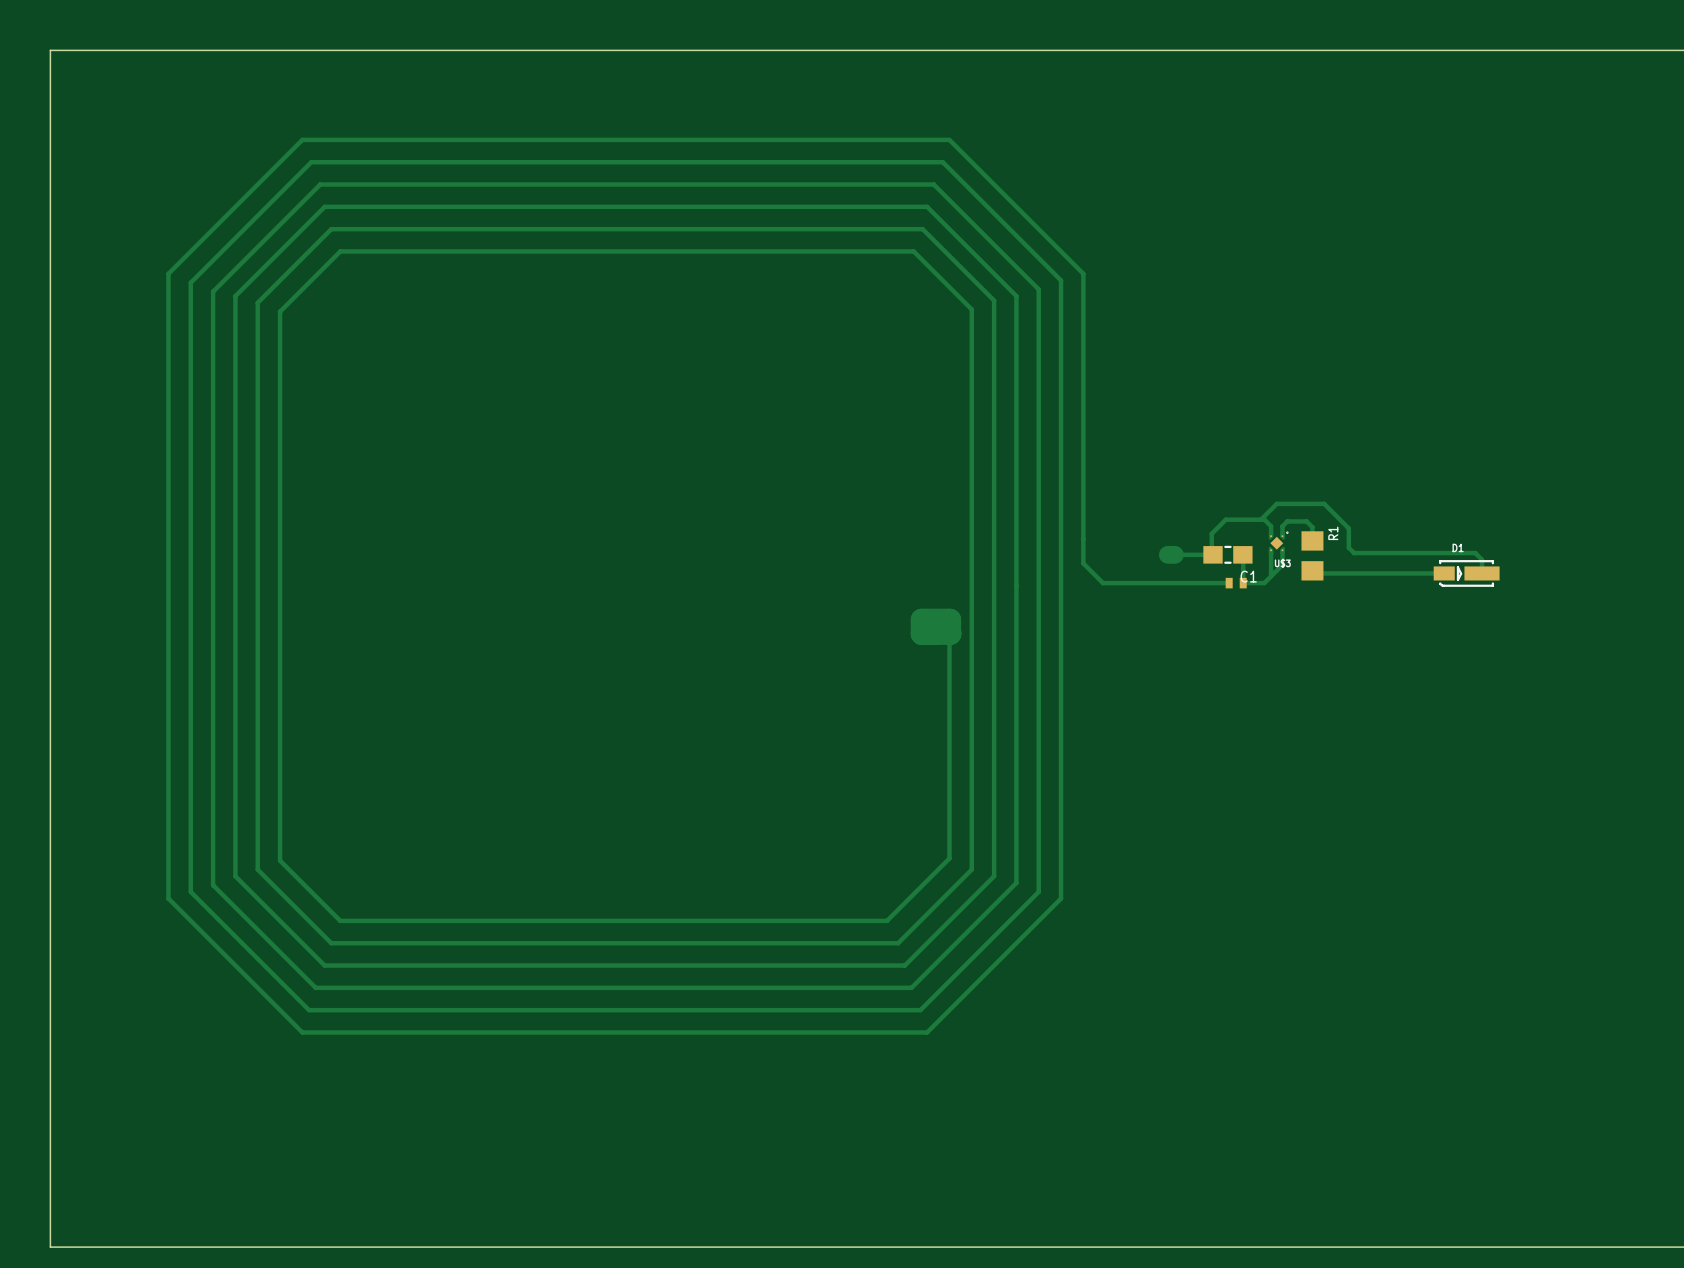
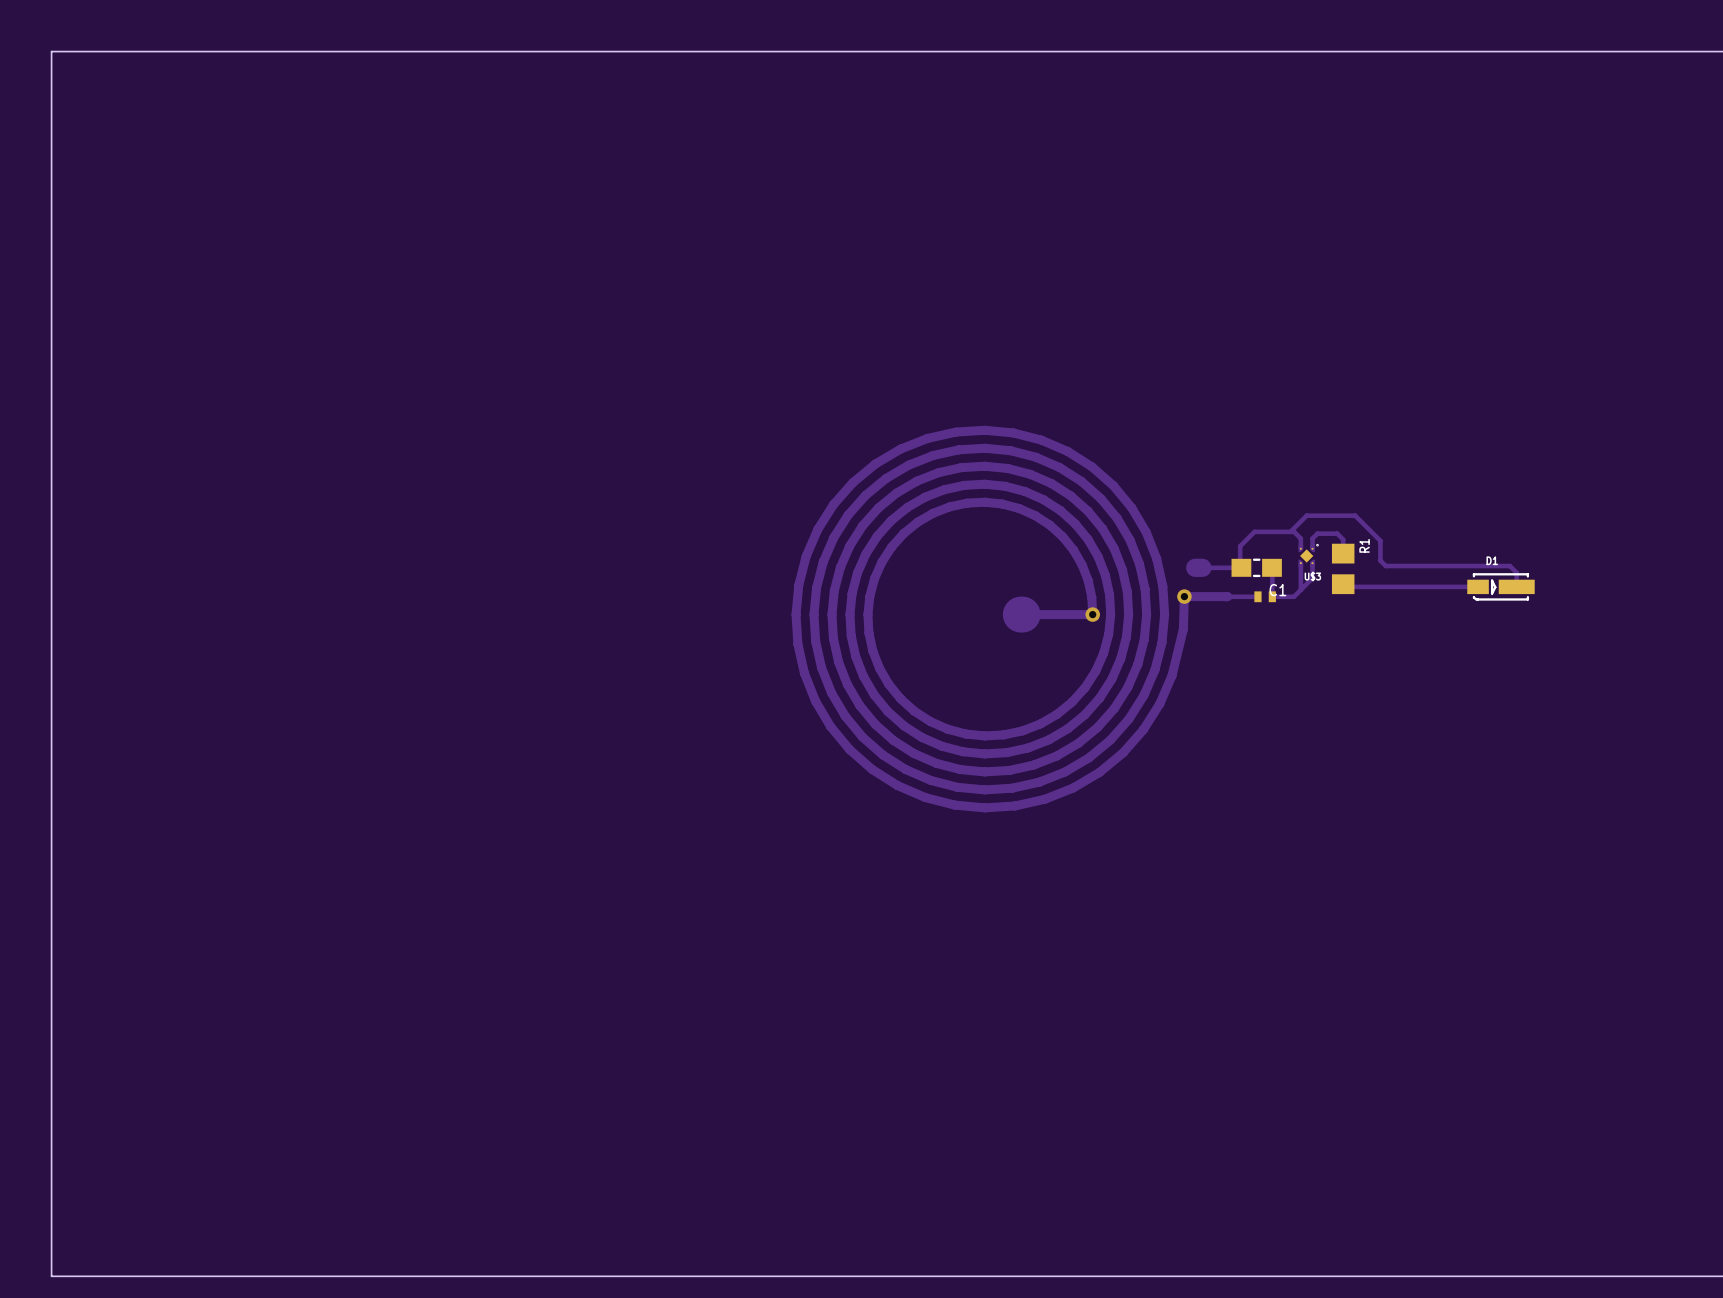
via: none -> (1184, 596)
track: (1197, 583) (1103, 583) (1083, 563) (1083, 273) (949, 139) (302, 139) (168, 273) (168, 898) (302, 1032) (927, 1032) (1061, 898) (1061, 280) (942, 162) (311, 162) (190, 282) (190, 891) (309, 1010) (920, 1010) (1038, 891) (1038, 289) (933, 184) (320, 184) (213, 291) (213, 885) (315, 987) (911, 987) (1016, 882) (1016, 296) (927, 206) (324, 206) (235, 296) (235, 876) (324, 965) (904, 965) (994, 876) (994, 300) (922, 229) (331, 229) (257, 302) (257, 869) (331, 943) (898, 943) (971, 869) (971, 309) (913, 251) (340, 251) (280, 311) (280, 860) (340, 920) (887, 920) (949, 858) (949, 630) -> (1225, 596) (1227, 596) (1184, 596) (1183, 629) (1172, 675) (1159, 703) (1143, 729) (1123, 752) (1099, 772) (1073, 788) (1044, 799) (1015, 805) (984, 807) (954, 805) (925, 797) (897, 785) (872, 769) (849, 749) (830, 726) (815, 700) (804, 673) (797, 644) (796, 614) (798, 585) (806, 556) (817, 529) (833, 504) (852, 482) (875, 464) (900, 449) (927, 438) (955, 432) (984, 430) (1013, 432) (1041, 440) (1067, 451) (1092, 466) (1113, 485) (1131, 507) (1146, 532) (1156, 558) (1162, 586) (1164, 614) (1161, 642) (1154, 669) (1143, 695) (1128, 719) (1110, 740) (1088, 757) (1065, 771) (1039, 782) (1012, 788) (984, 789) (957, 787) (930, 780) (905, 769) (882, 754) (862, 736) (845, 716) (831, 692) (821, 667) (815, 641) (814, 614) (816, 587) (823, 562) (833, 537) (848, 515) (865, 495) (886, 478) (908, 465) (933, 455) (958, 449) (984, 448) (1010, 450) (1035, 457) (1059, 467) (1081, 481) (1100, 498) (1117, 518) (1130, 540) (1139, 564) (1145, 589) (1146, 614) (1144, 639) (1137, 664) (1127, 687) (1114, 708) (1097, 727) (1078, 743) (1056, 755) (1033, 765) (1009, 770) (984, 771) (960, 769) (936, 763) (914, 753) (893, 740) (875, 724) (859, 705) (847, 684) (838, 662) (833, 638) (831, 614) (834, 590) (840, 567) (849, 545) (862, 525) (878, 508) (896, 493) (916, 481) (938, 472) (961, 467) (984, 466) (1007, 468) (1030, 474) (1051, 483) (1070, 496) (1088, 511) (1102, 528) (1114, 548) (1122, 569) (1127, 592) (1128, 614) (1126, 637) (1120, 658) (1111, 679) (1099, 698) (1084, 714) (1067, 728) (1048, 739) (1028, 747) (1006, 752) (984, 753) (963, 751) (942, 746) (922, 737) (903, 725) (887, 711) (874, 694) (863, 676) (855, 656) (851, 635) (849, 614) (852, 593) (857, 573) (865, 553) (877, 536) (891, 520) (907, 507) (925, 497) (944, 489) (964, 485) (984, 484) (1005, 486) (1024, 491) (1043, 499) (1060, 510) (1075, 523) (1088, 539) (1098, 556) (1105, 575) (1109, 594) (1110, 614) (1108, 634) (1103, 653) (1095, 671) (1085, 687) (1072, 702) (1057, 714) (1040, 723) (1022, 730) (1003, 734) (965, 734) (930, 721) (900, 698) (879, 668) (872, 650) (867, 614) (869, 596) (881, 562) (891, 546) (917, 522) (949, 506) (984, 502) (1019, 508) (1049, 525) (1062, 536) (1082, 564) (1088, 580) (1092, 614) (1020, 614)
via: none -> (1092, 614)
track: (949, 633) (949, 619) (921, 619) (921, 633) (935, 633) -> none

